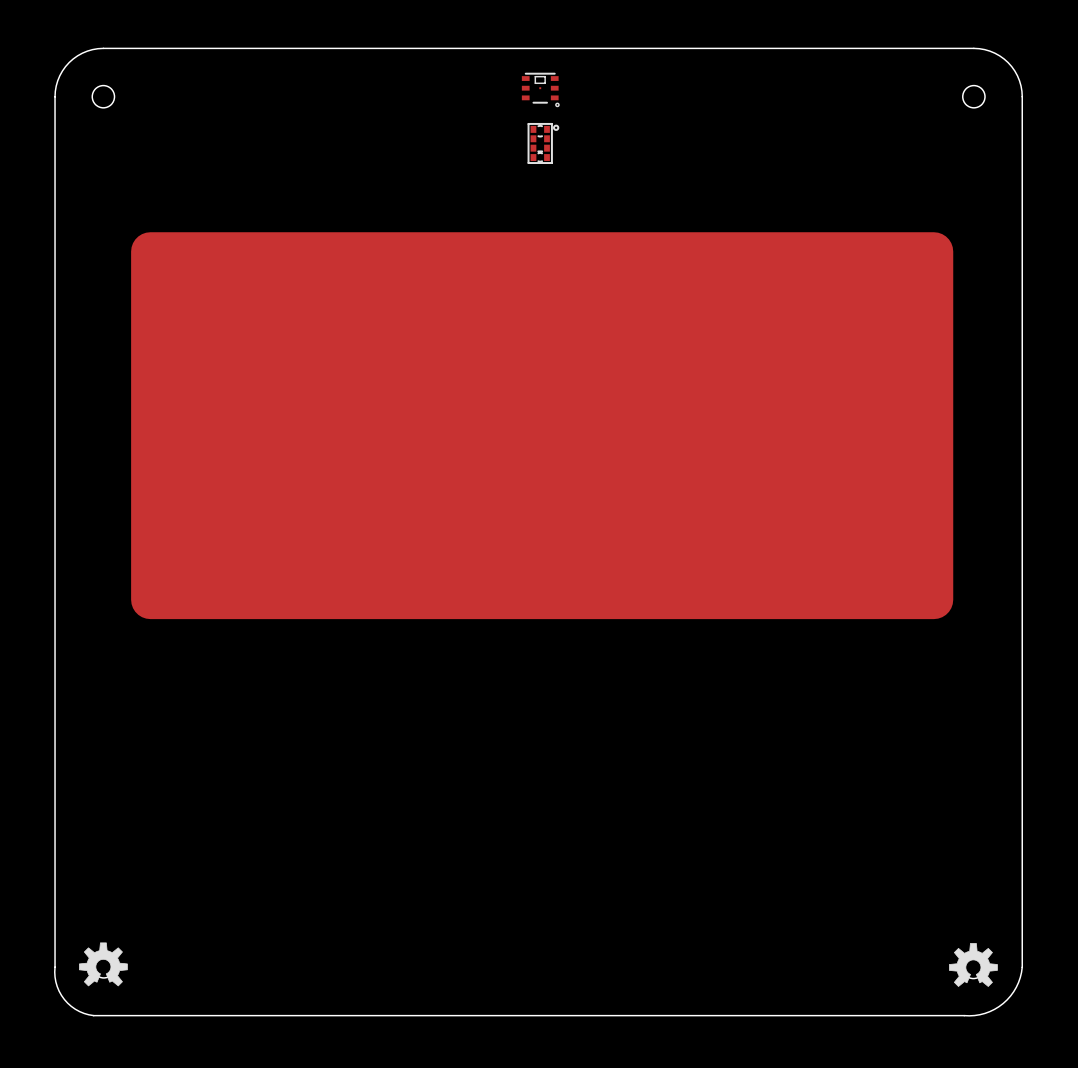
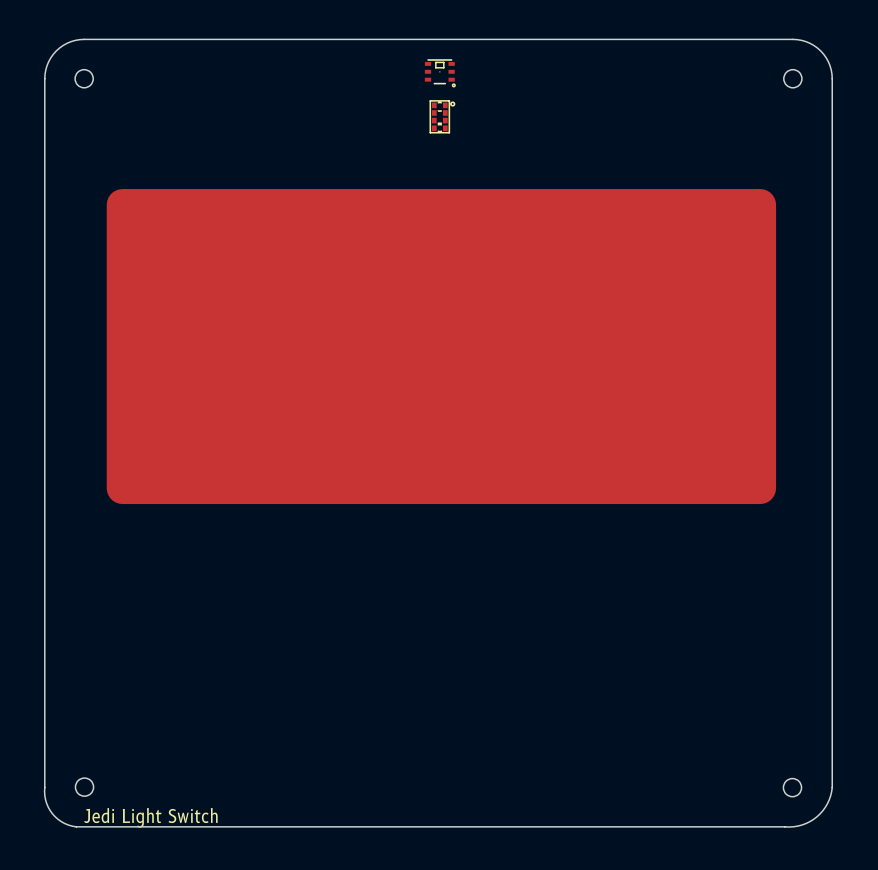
drawing: [79, 942, 128, 987] -> none
drawing: [949, 943, 998, 987] -> none
text: none -> Jedi Light Switch (150, 817)

